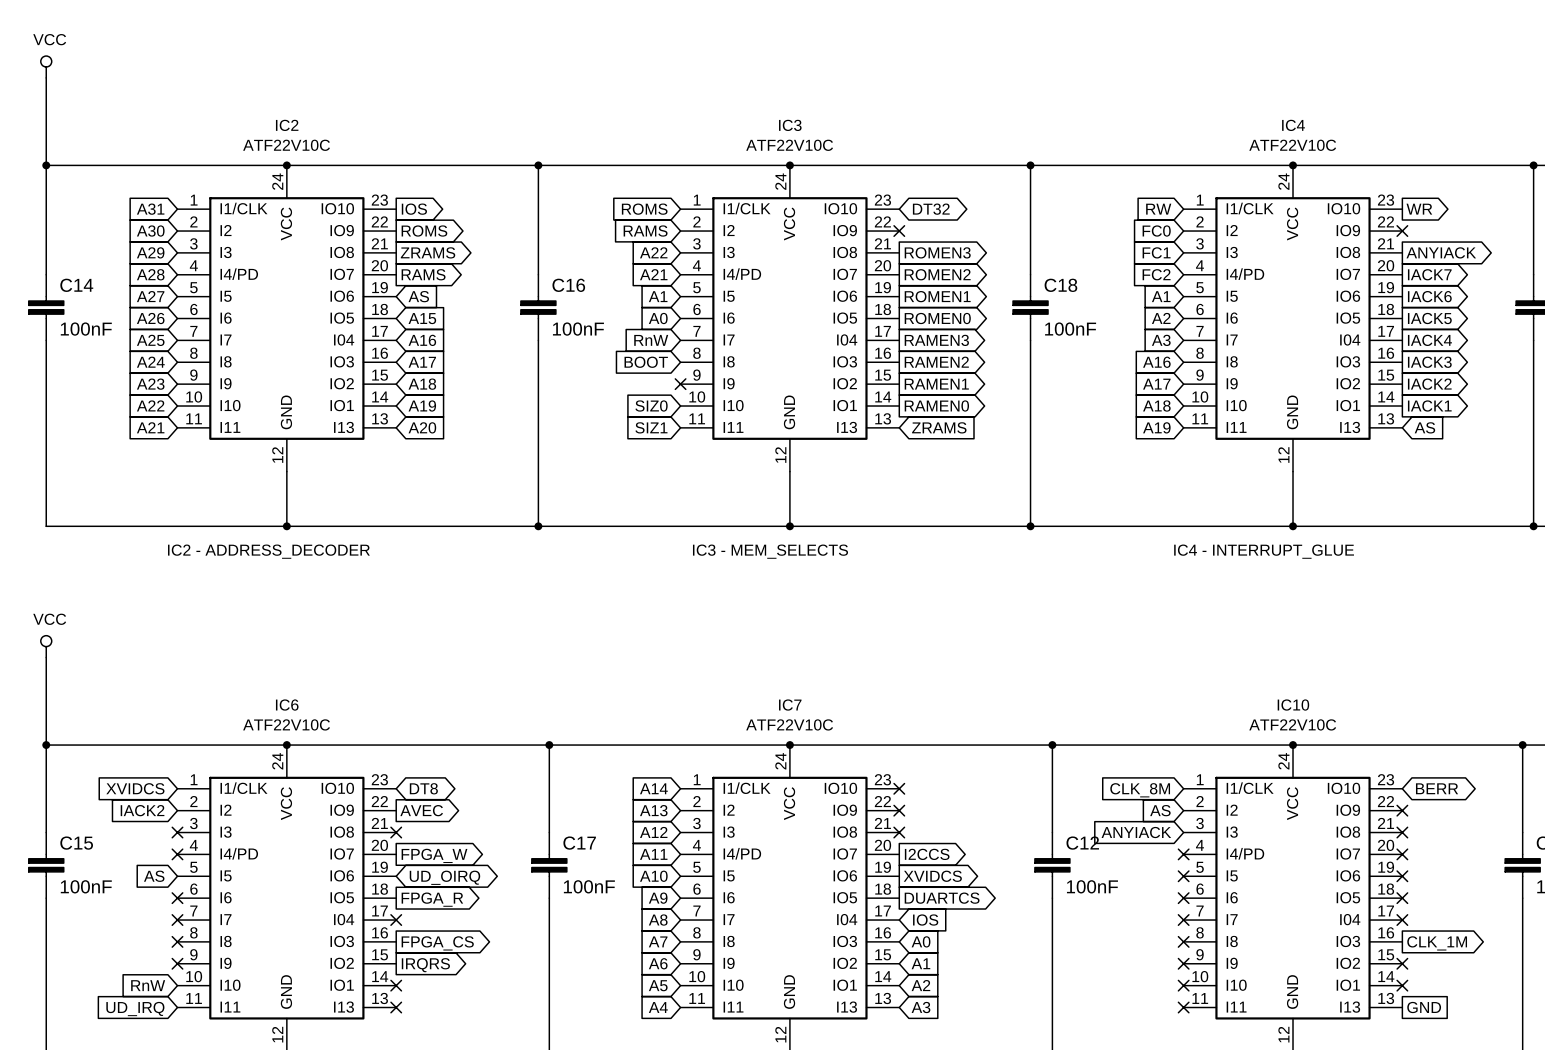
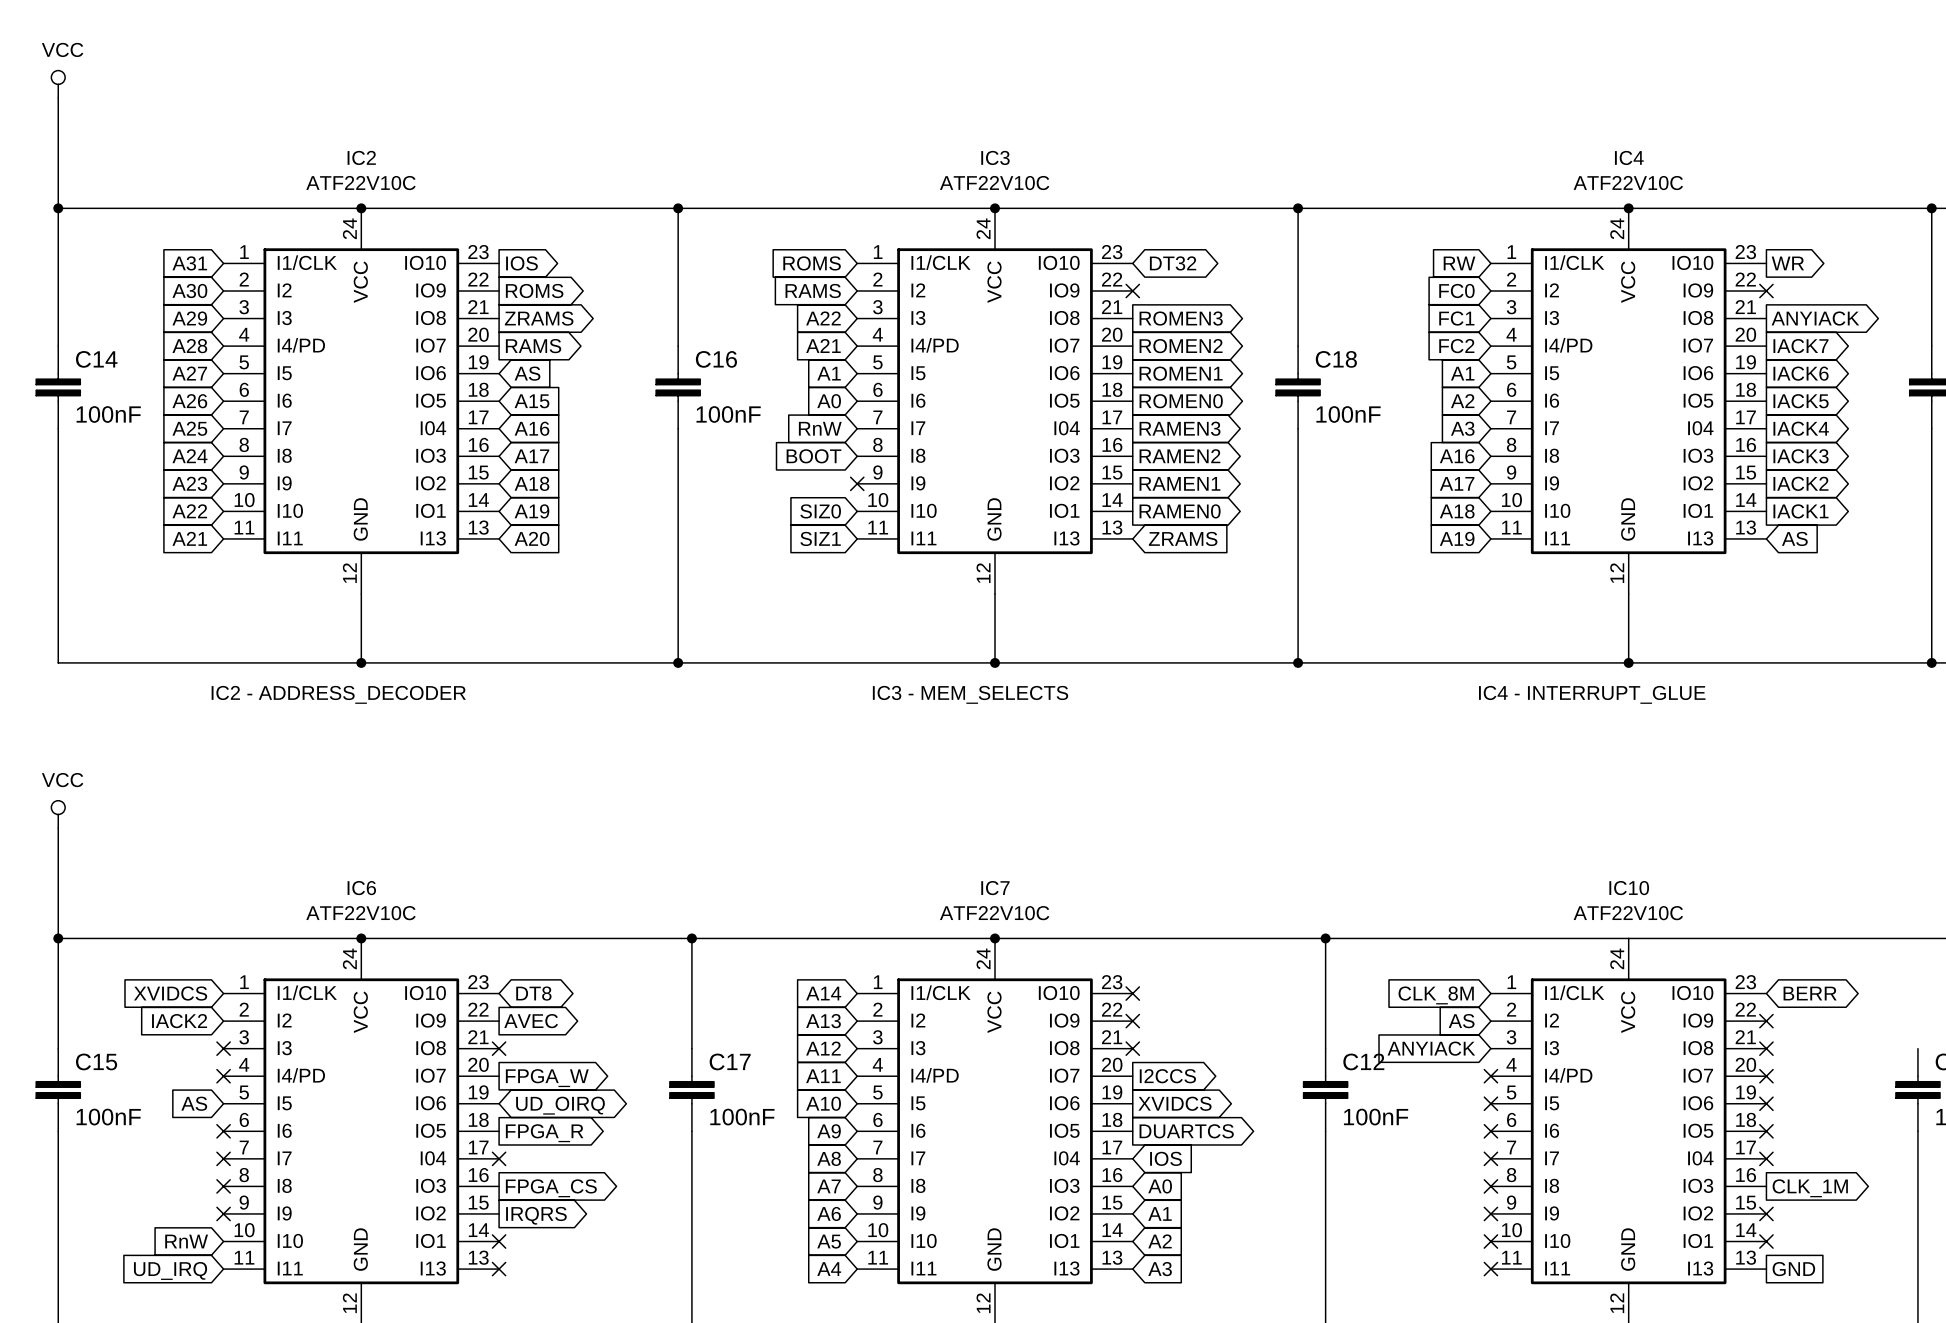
junction: (1293, 745) -> none
wire: (1522, 745) (1522, 832) -> none
junction: (1522, 745) -> none

